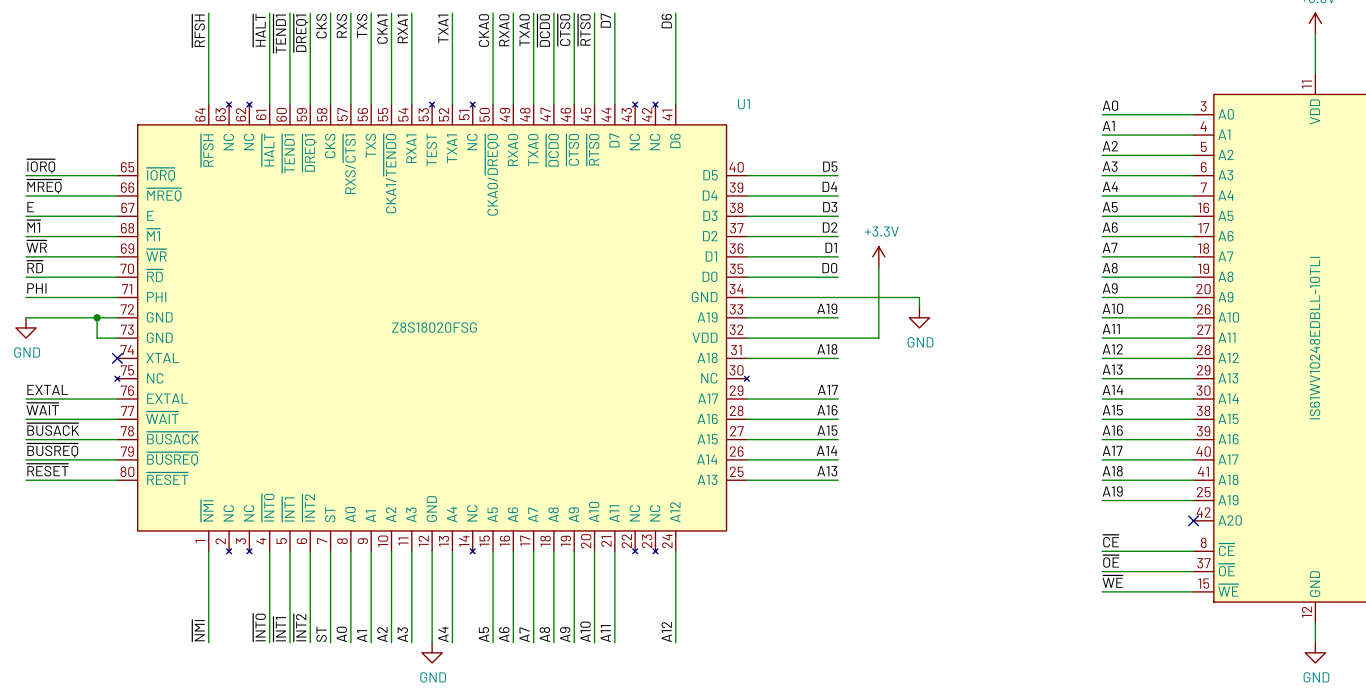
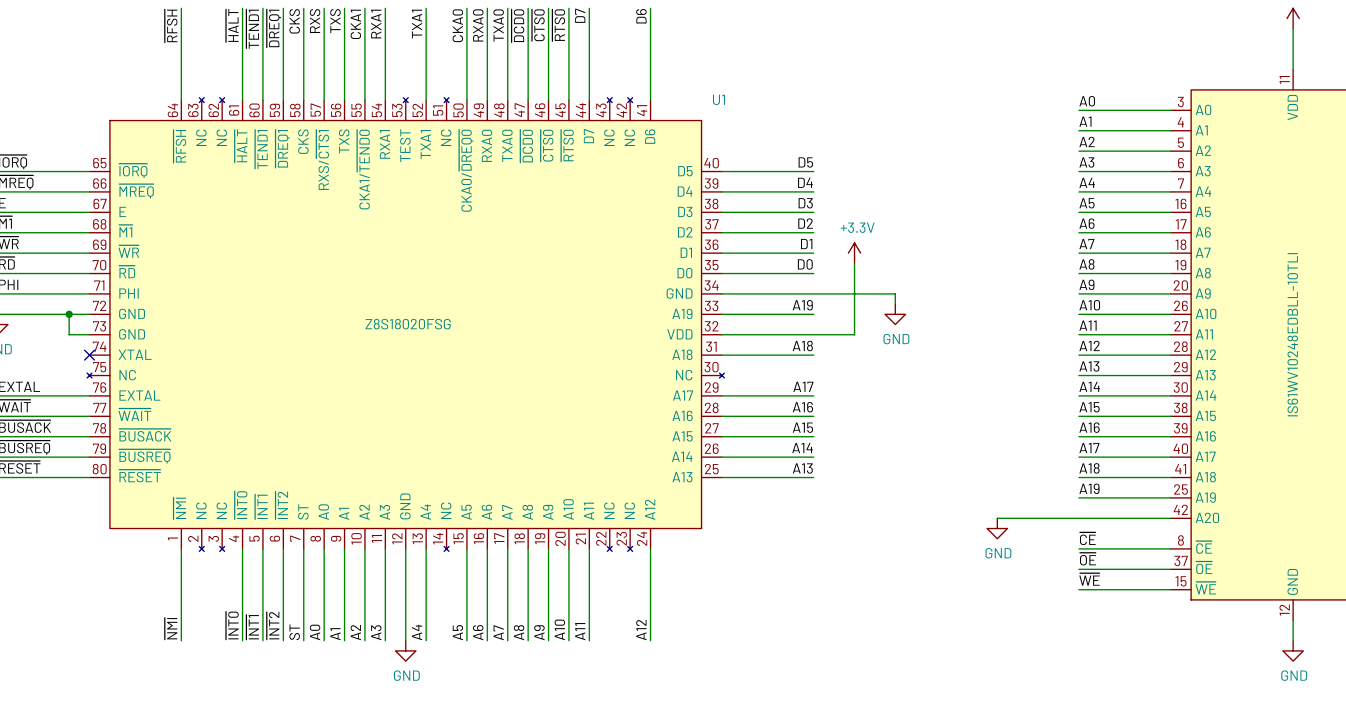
wire: none -> (997, 518) (1170, 518)
no-connect mark: (1193, 520) -> none
power symbol: none -> GND (997, 528)

